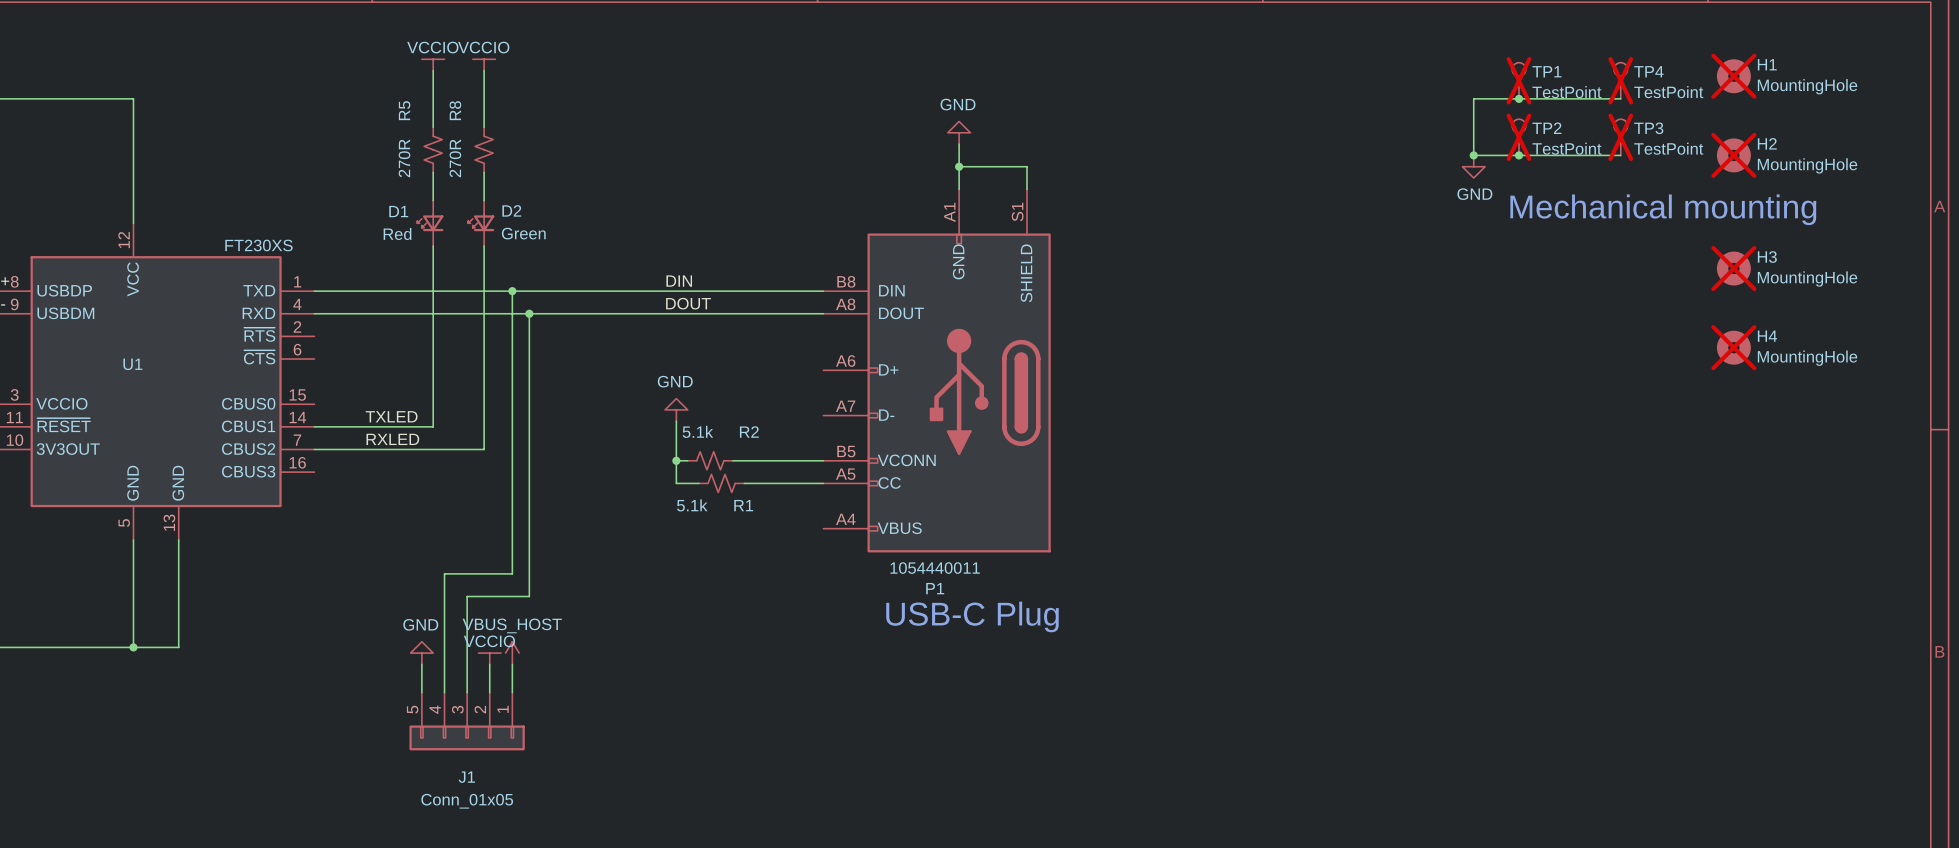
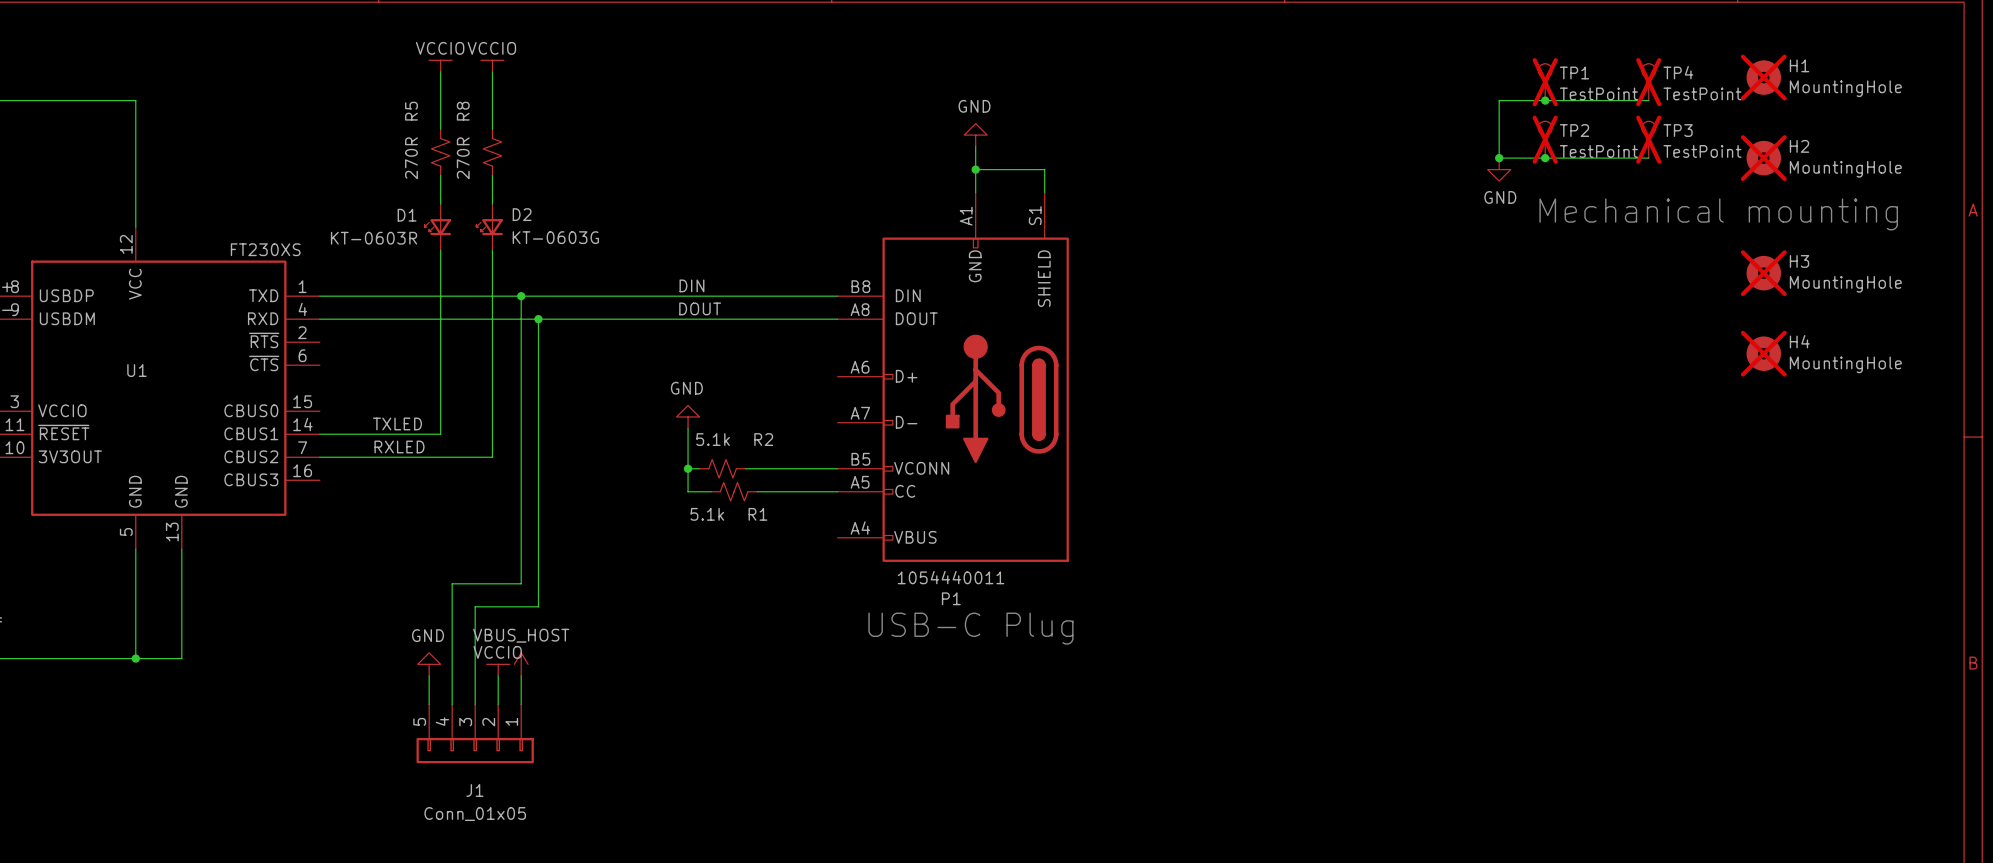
D1 value: Red (397, 233) -> KT-0603R (374, 238)
D2 value: Green (523, 233) -> KT-0603G (555, 237)

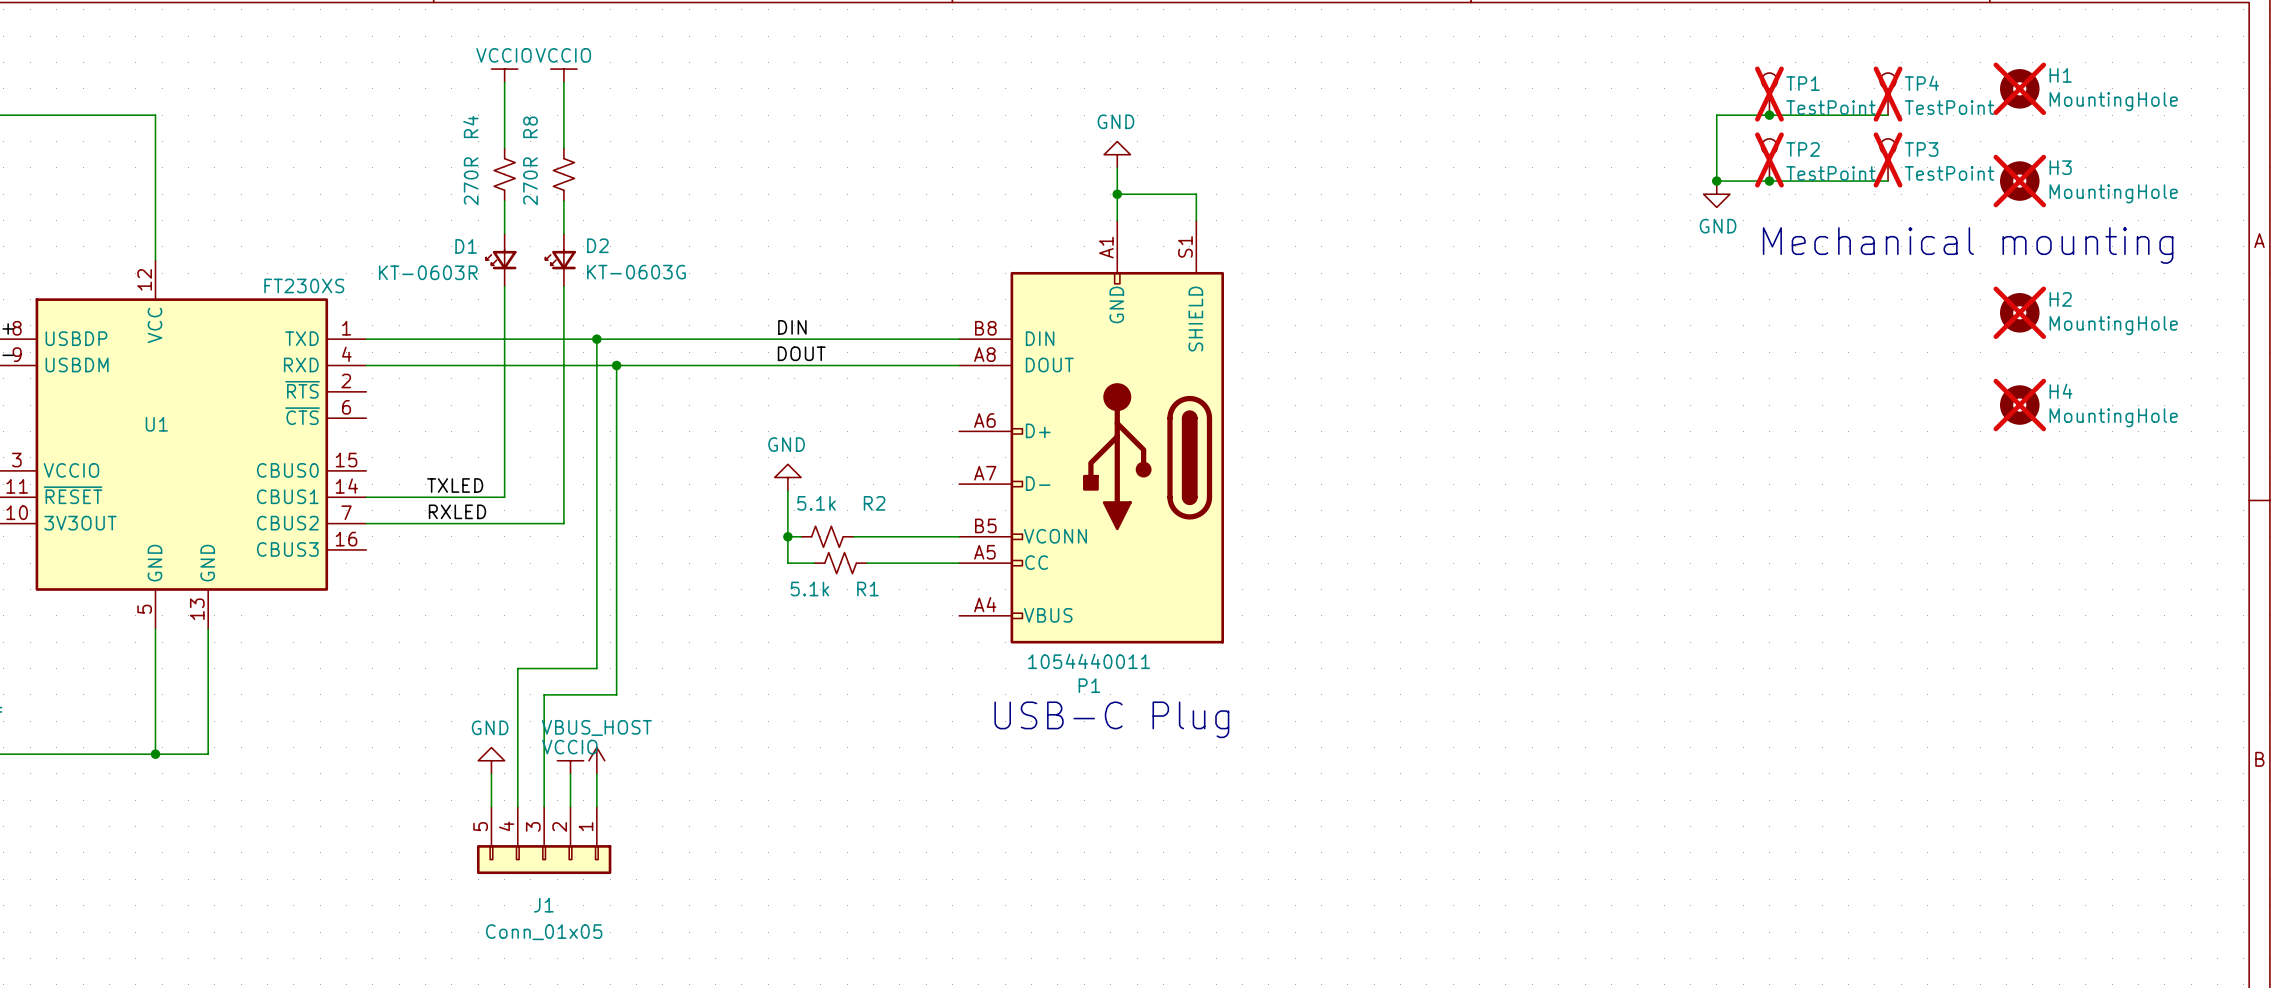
R5 name: R5 (411, 111) -> R4 (470, 126)
H2 name: H2 (1799, 146) -> H3 (2060, 167)
H3 name: H3 (1799, 261) -> H2 (2060, 299)

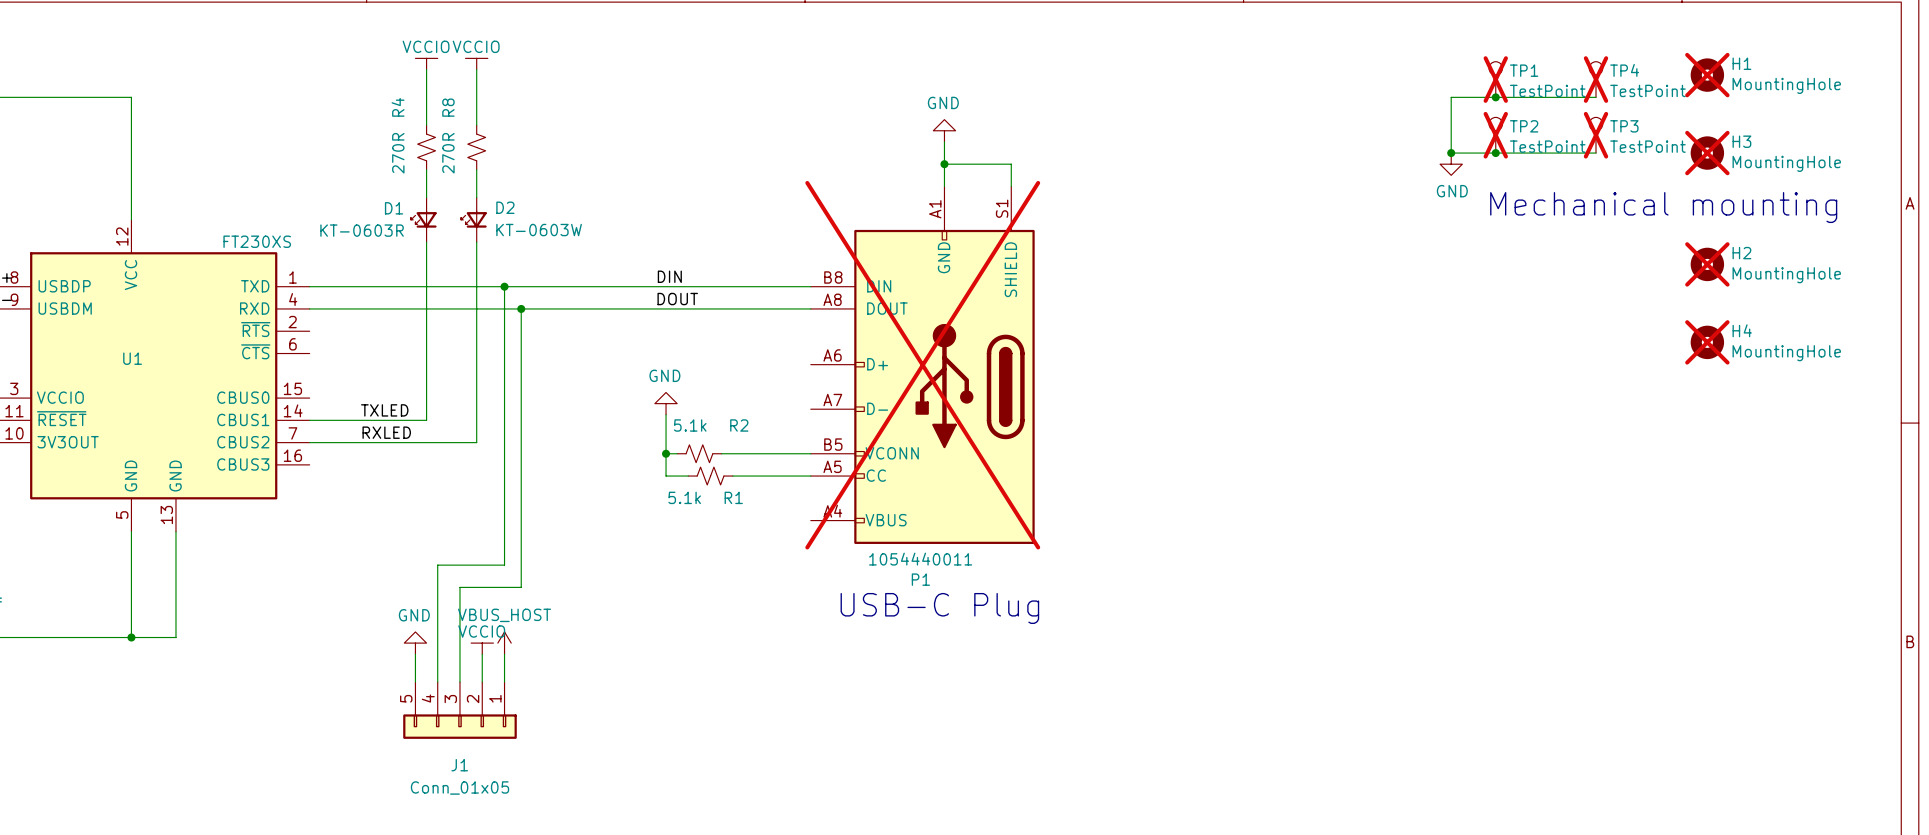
D2 value: KT-0603G (636, 272) -> KT-0603W (539, 230)
P1 do-not-place cross: none -> (922, 365)

